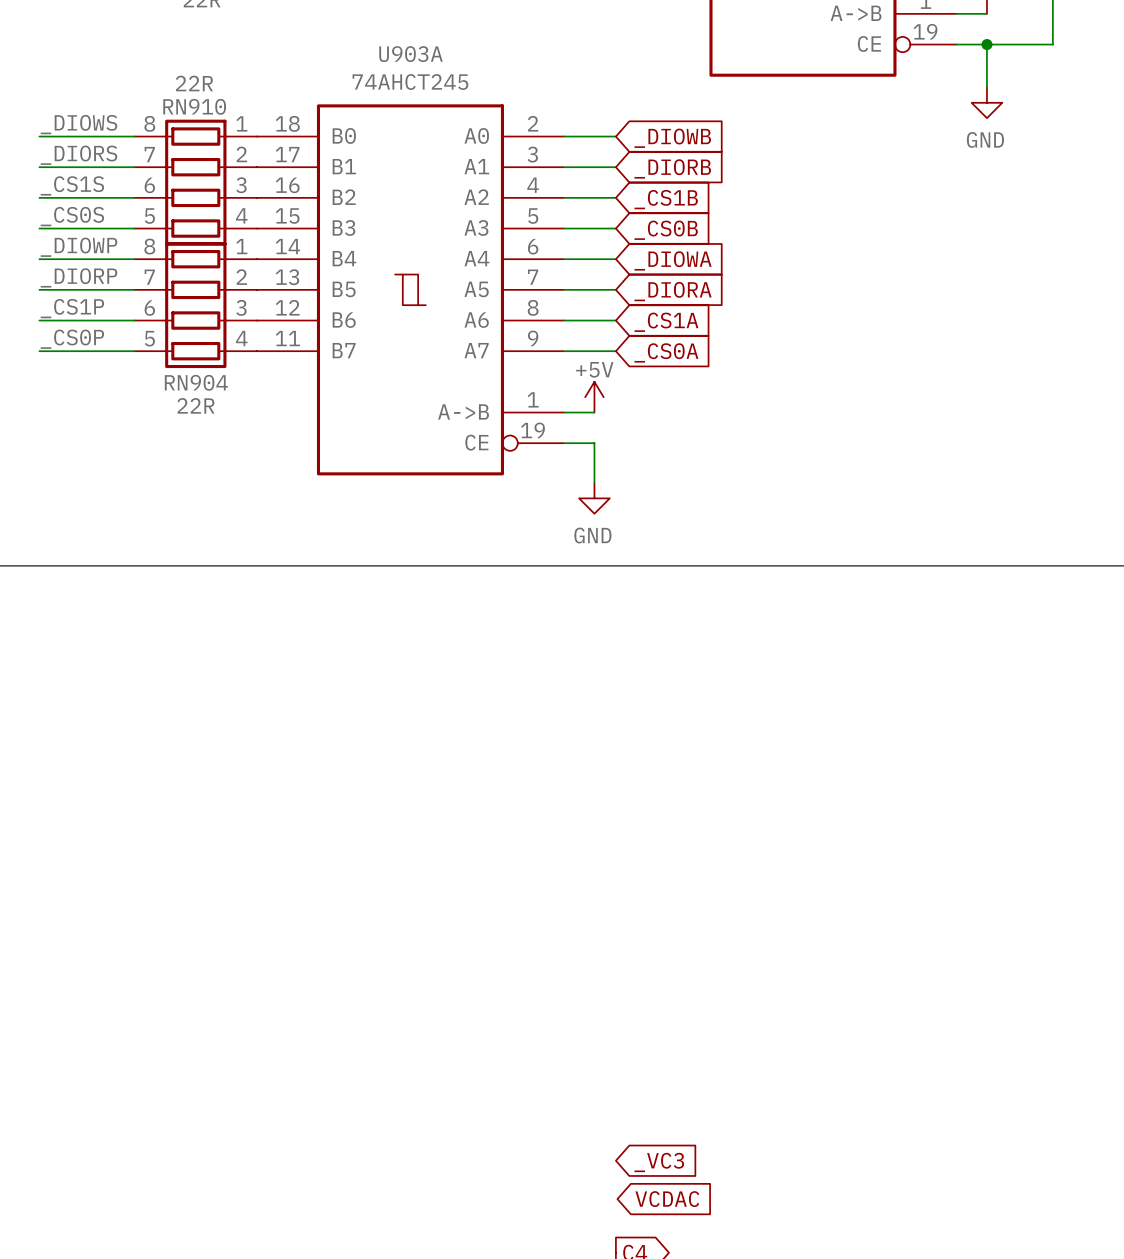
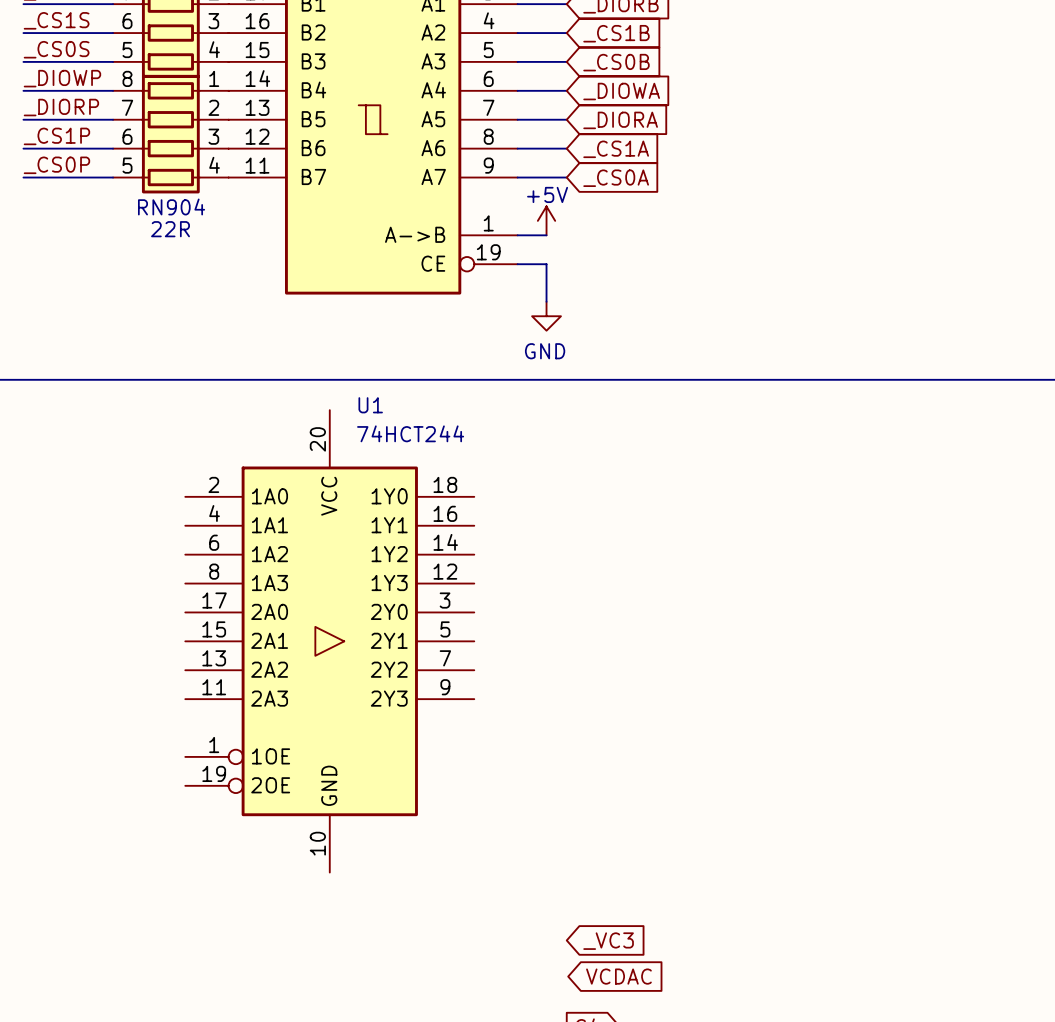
U1: none -> 74HCT244 (329, 641)

